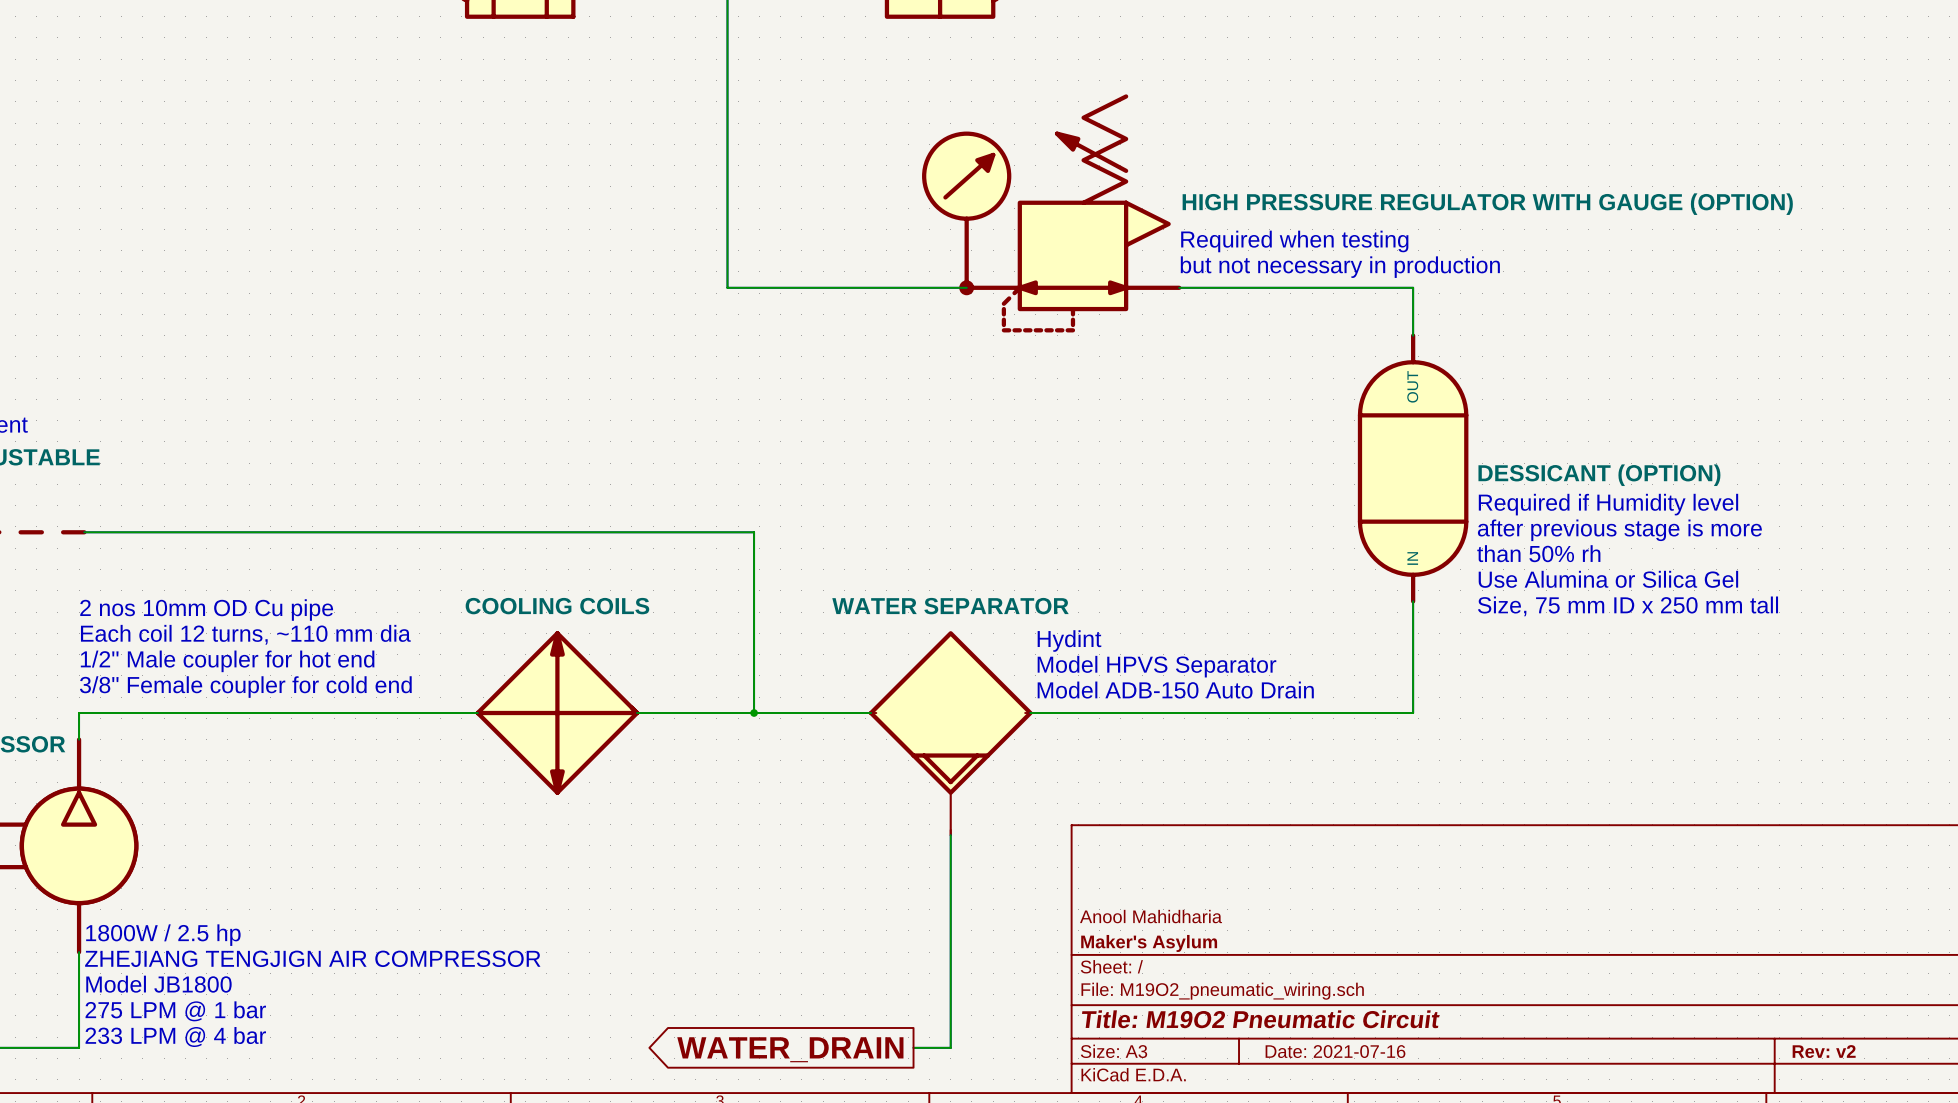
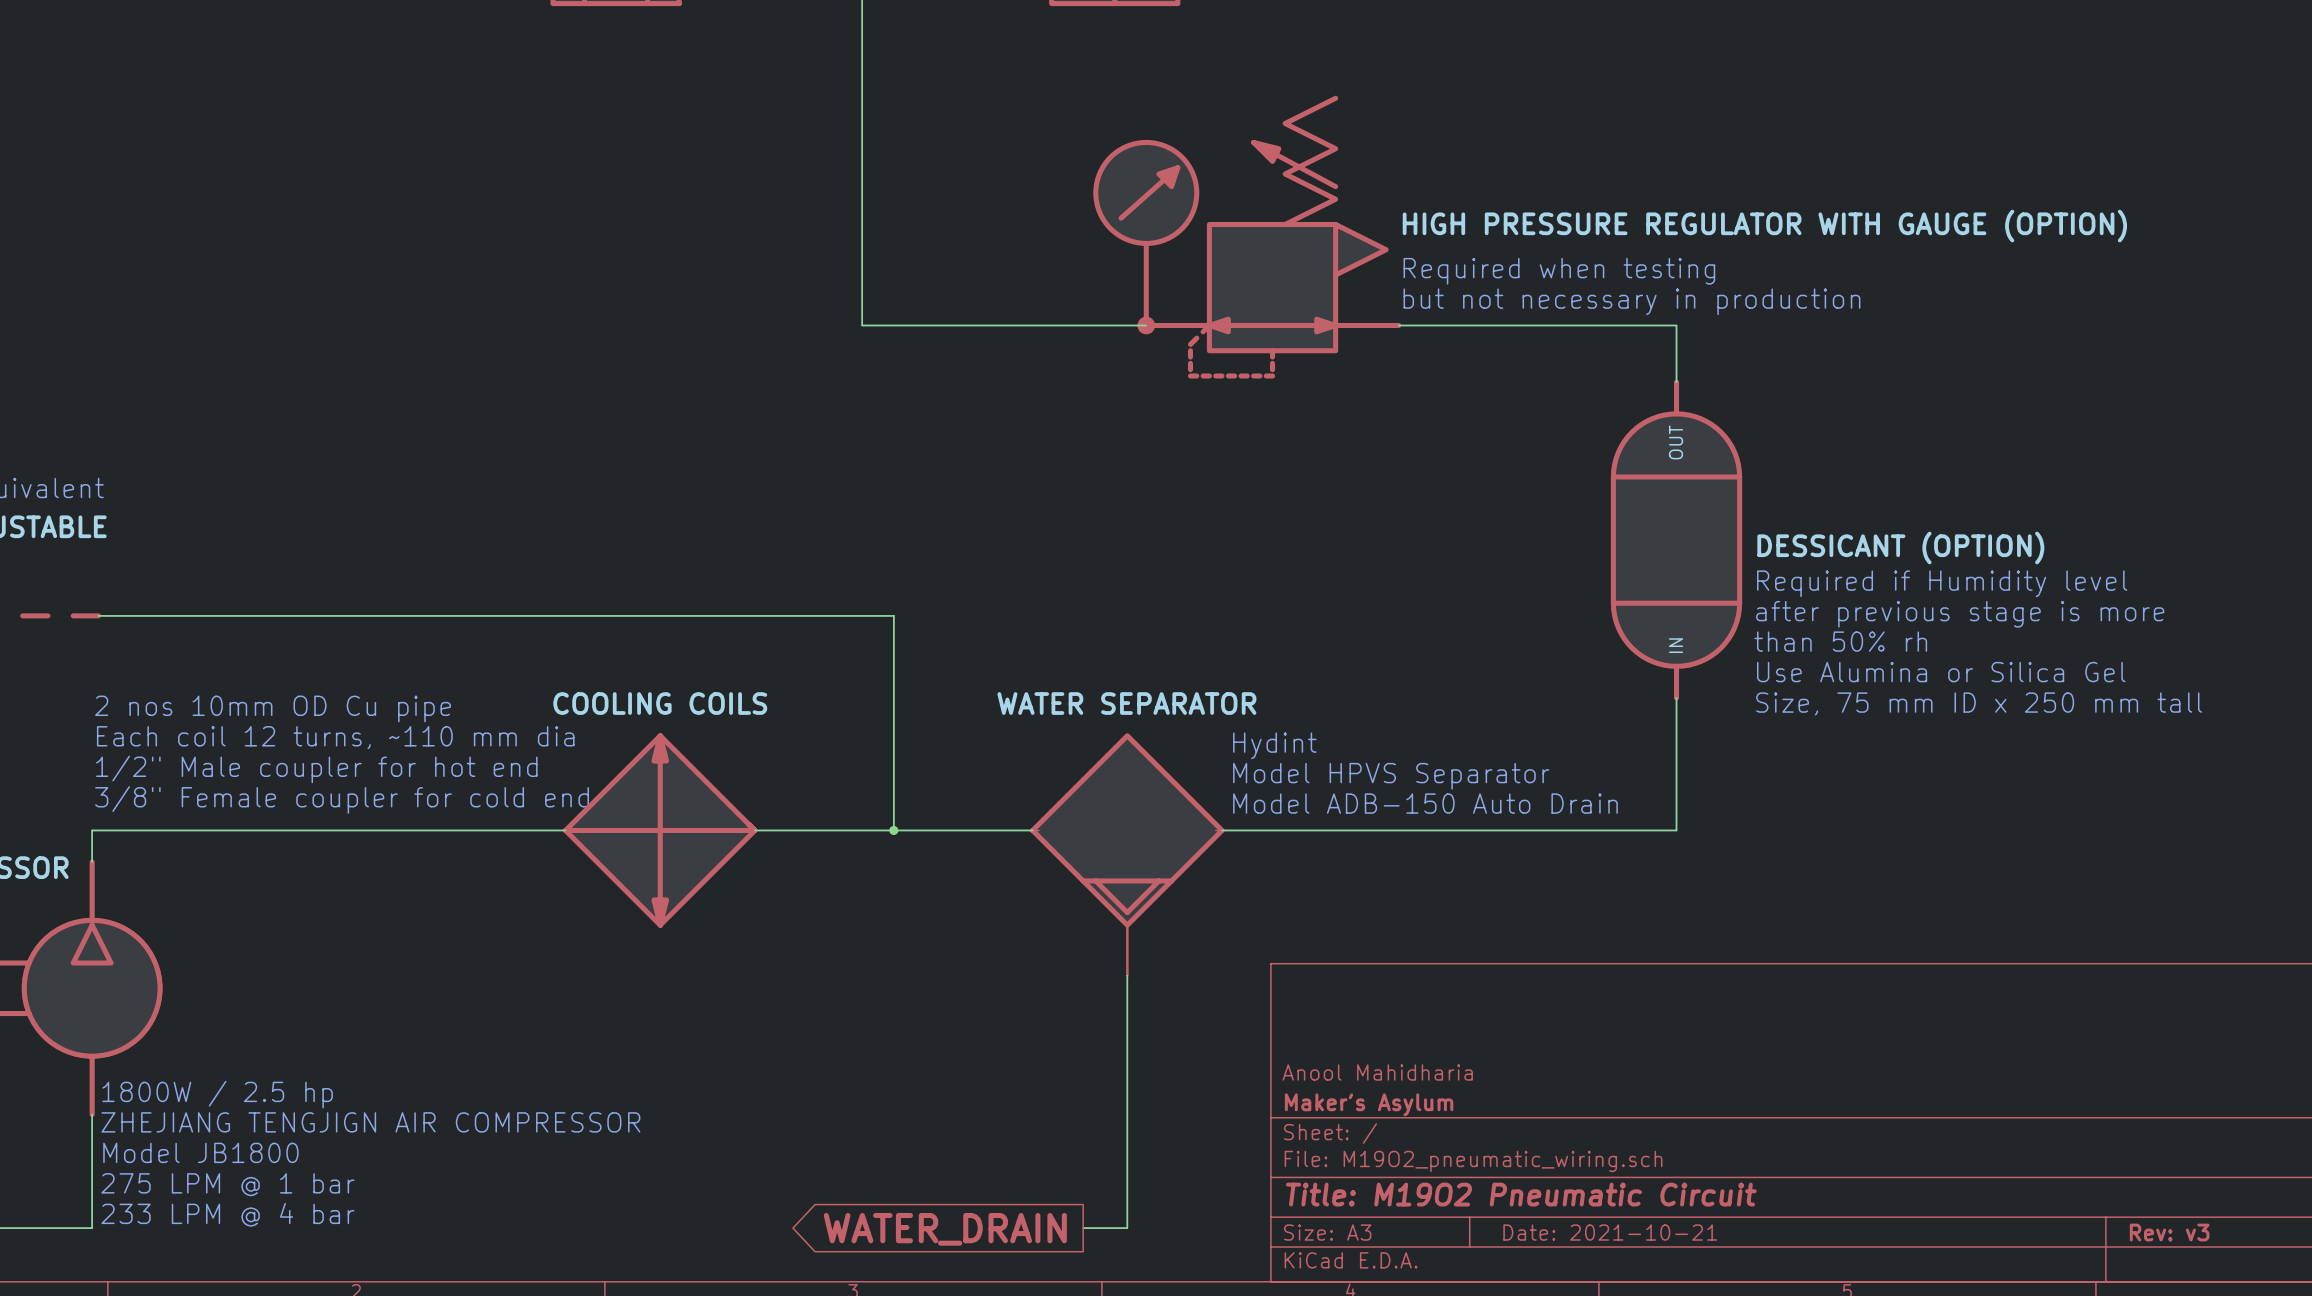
title block: Date: 2021-07-16 (1335, 1051) -> Date: 2021-10-21 (1610, 1232)
title block: Rev: v2 (1824, 1051) -> Rev: v3 (2169, 1232)

